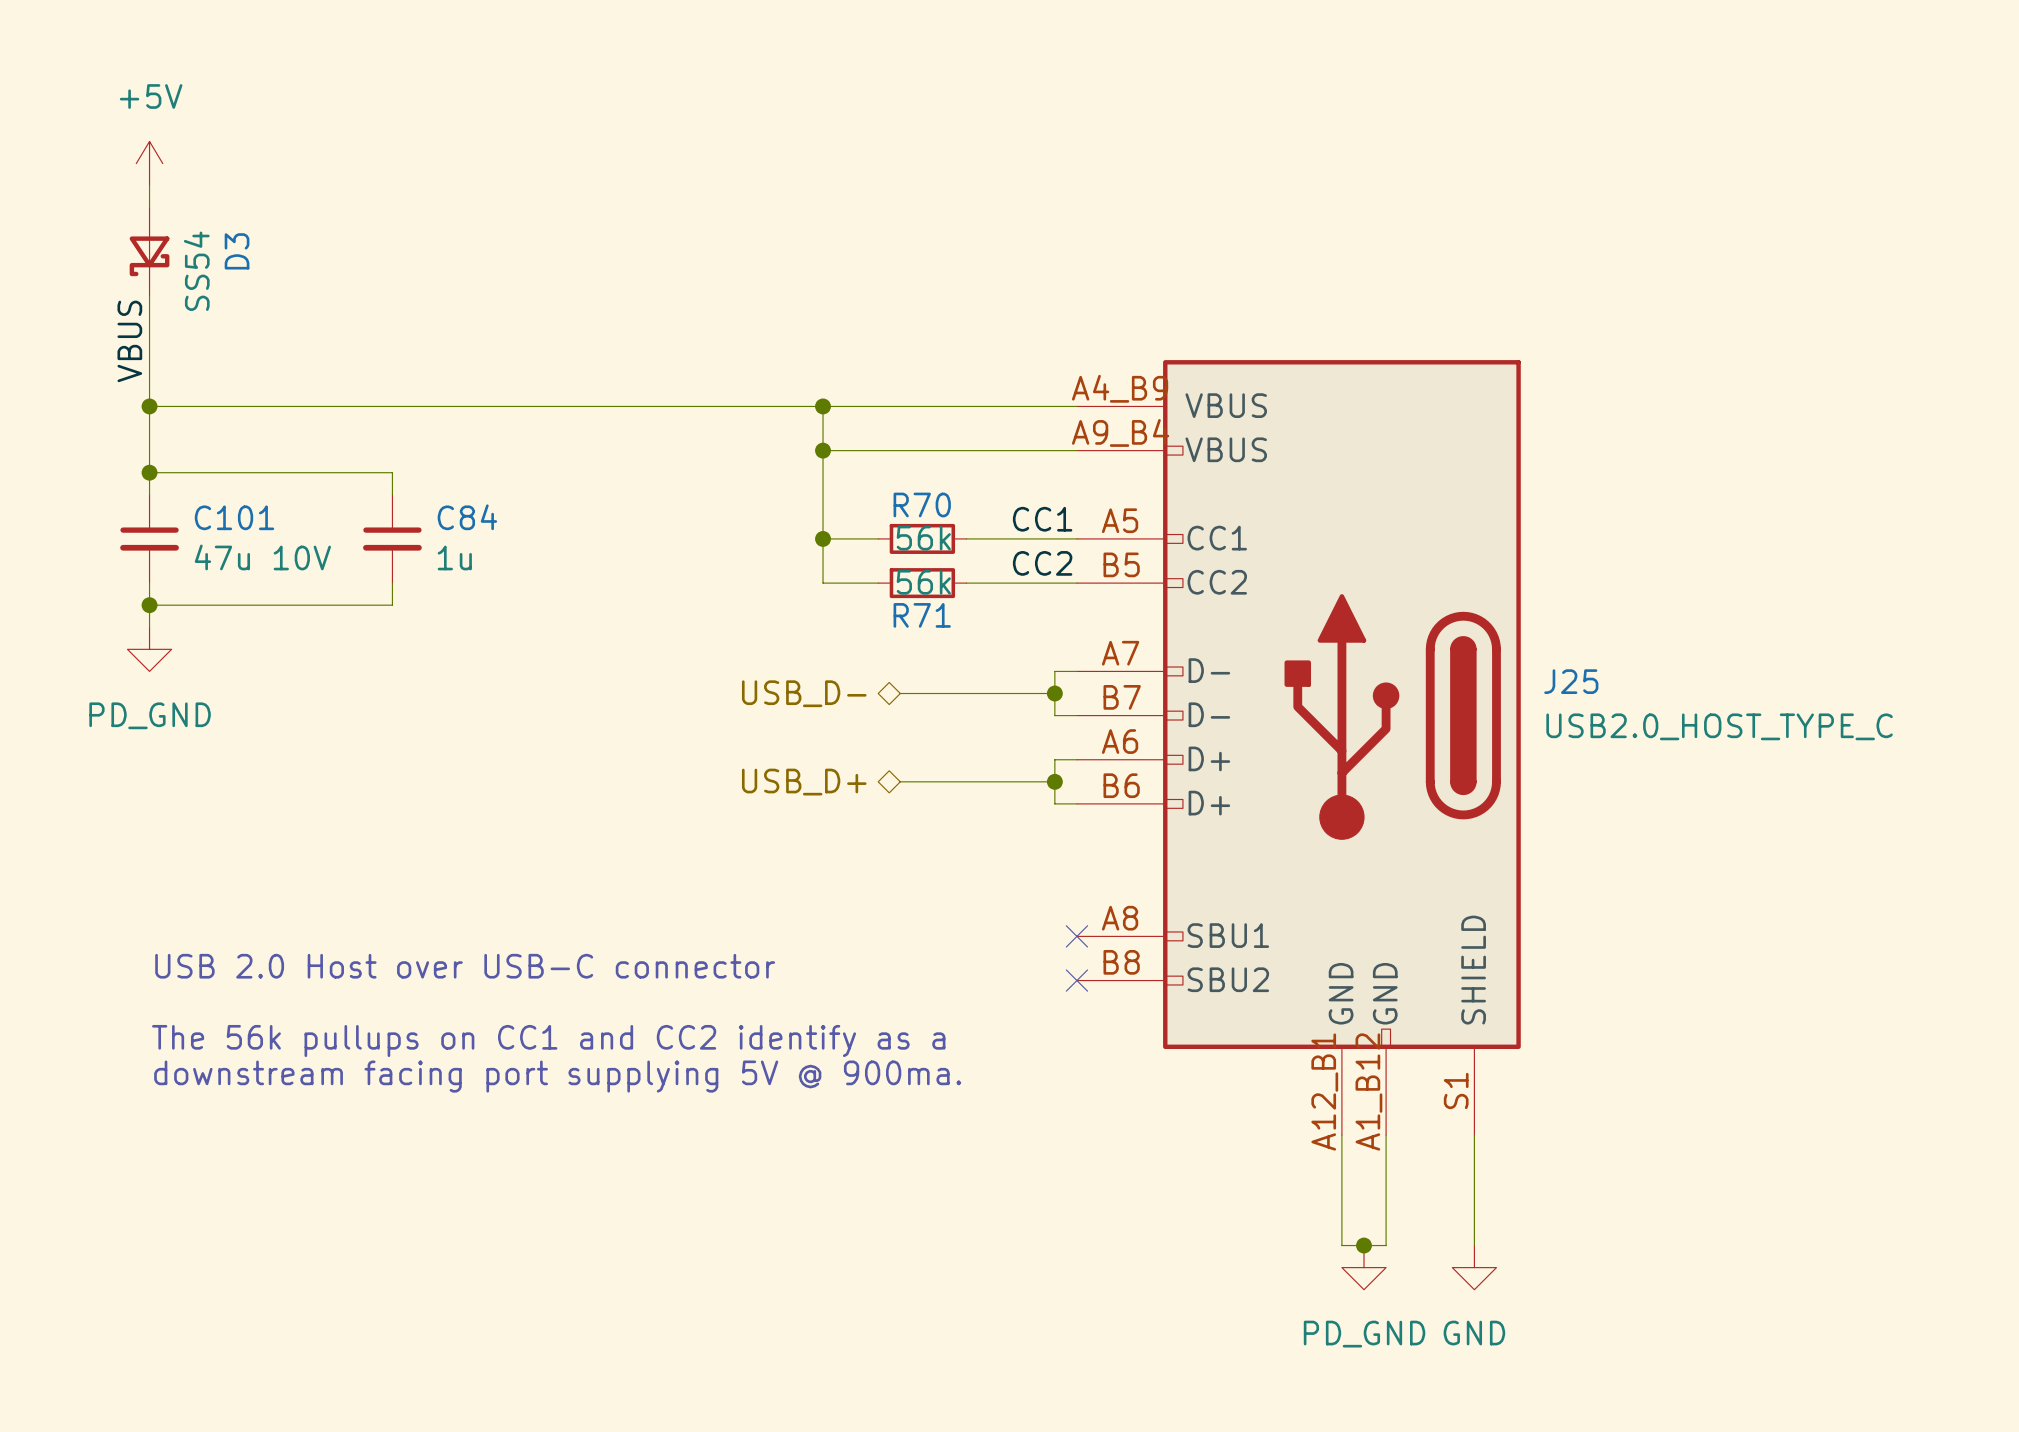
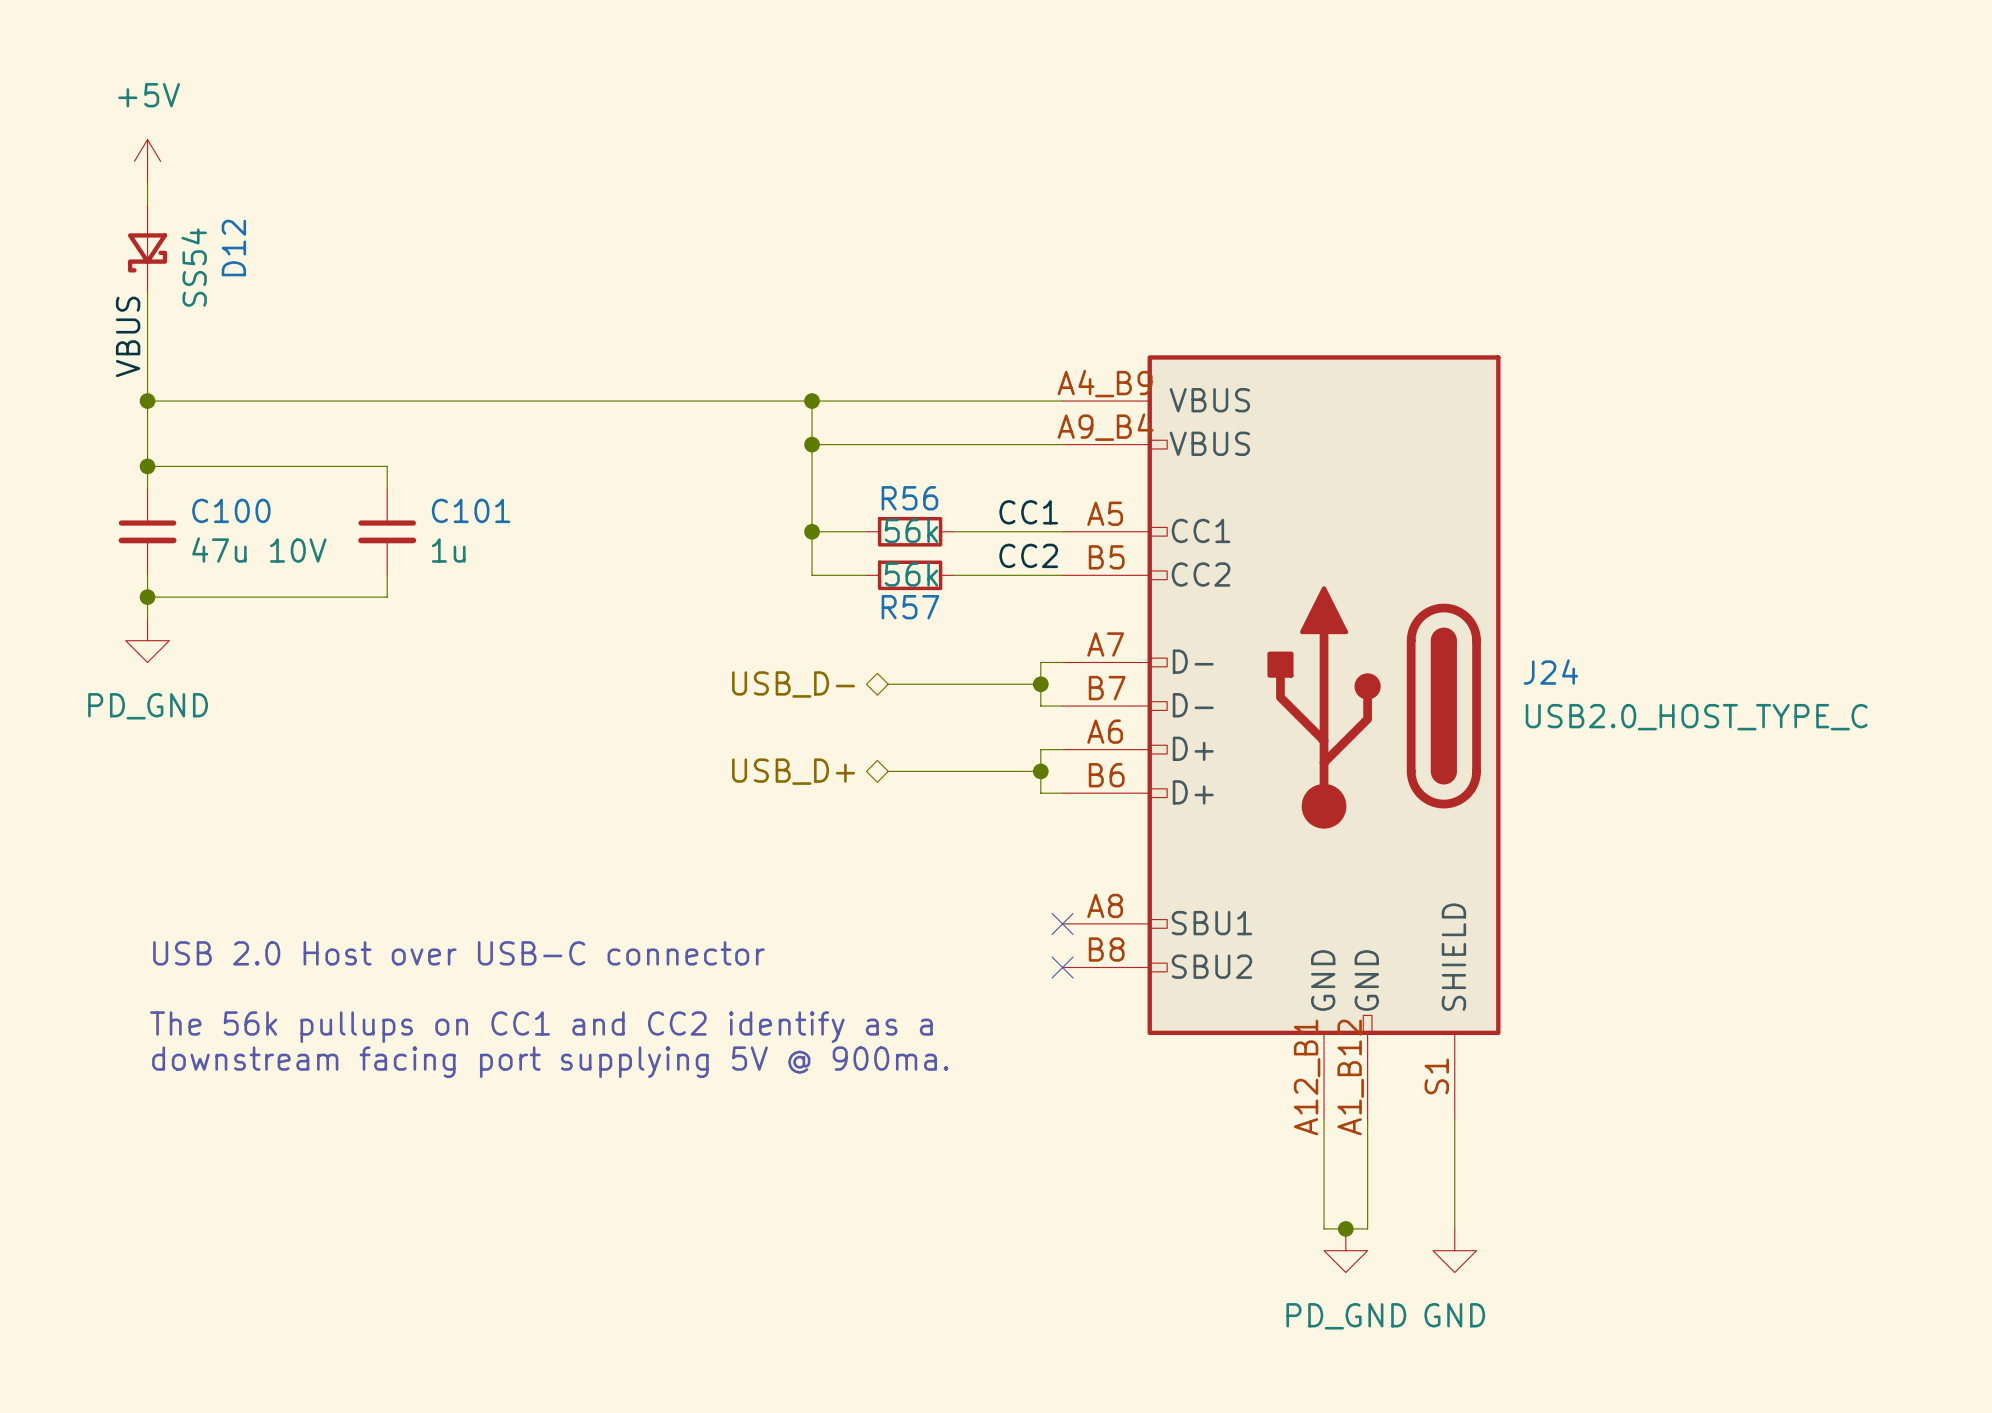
D3 name: D3 (237, 251) -> D12 (233, 248)
R70 name: R70 (922, 504) -> R56 (909, 498)
C101 name: C101 (234, 517) -> C100 (231, 510)
C84 name: C84 (467, 517) -> C101 (471, 510)
R71 name: R71 (922, 615) -> R57 (910, 607)
J25 name: J25 (1571, 681) -> J24 (1550, 672)

